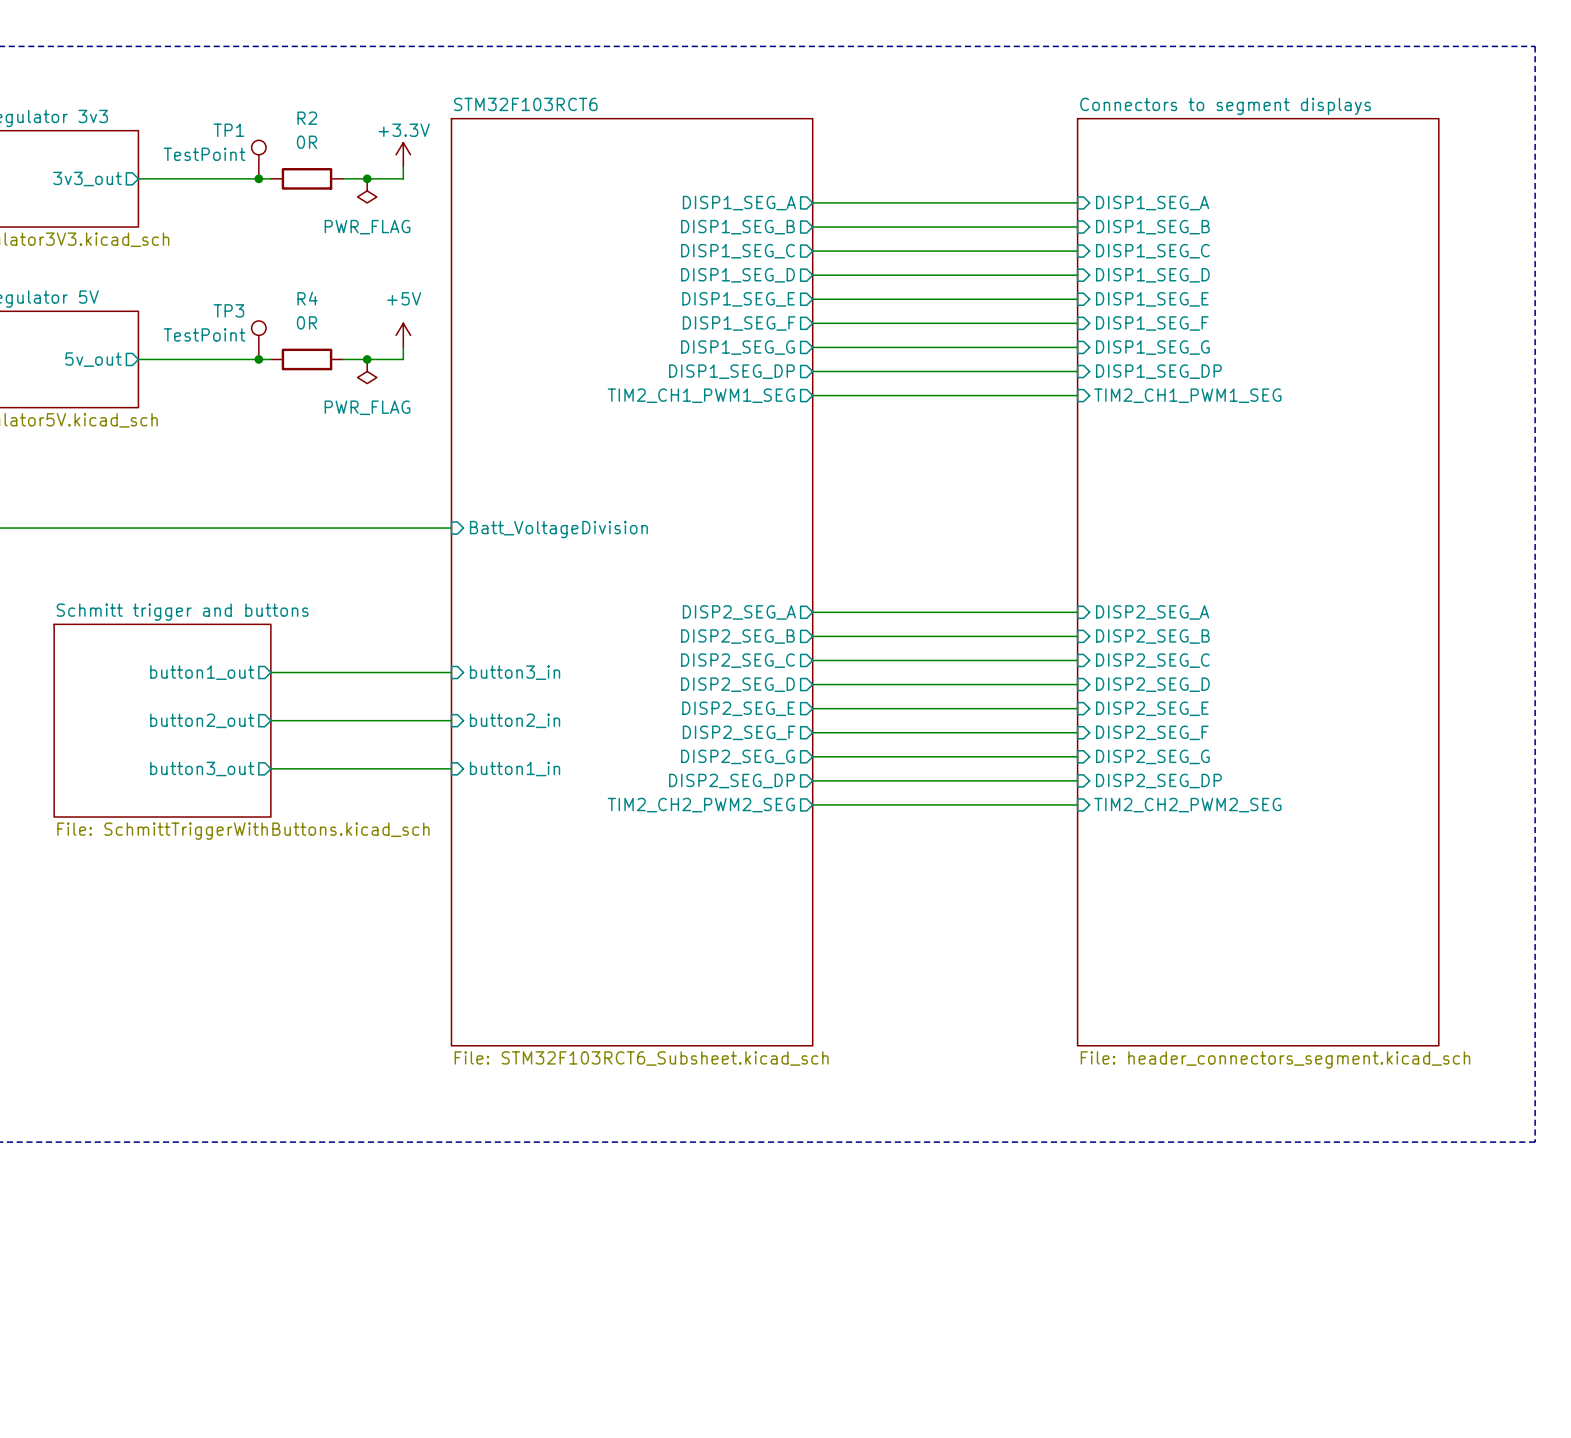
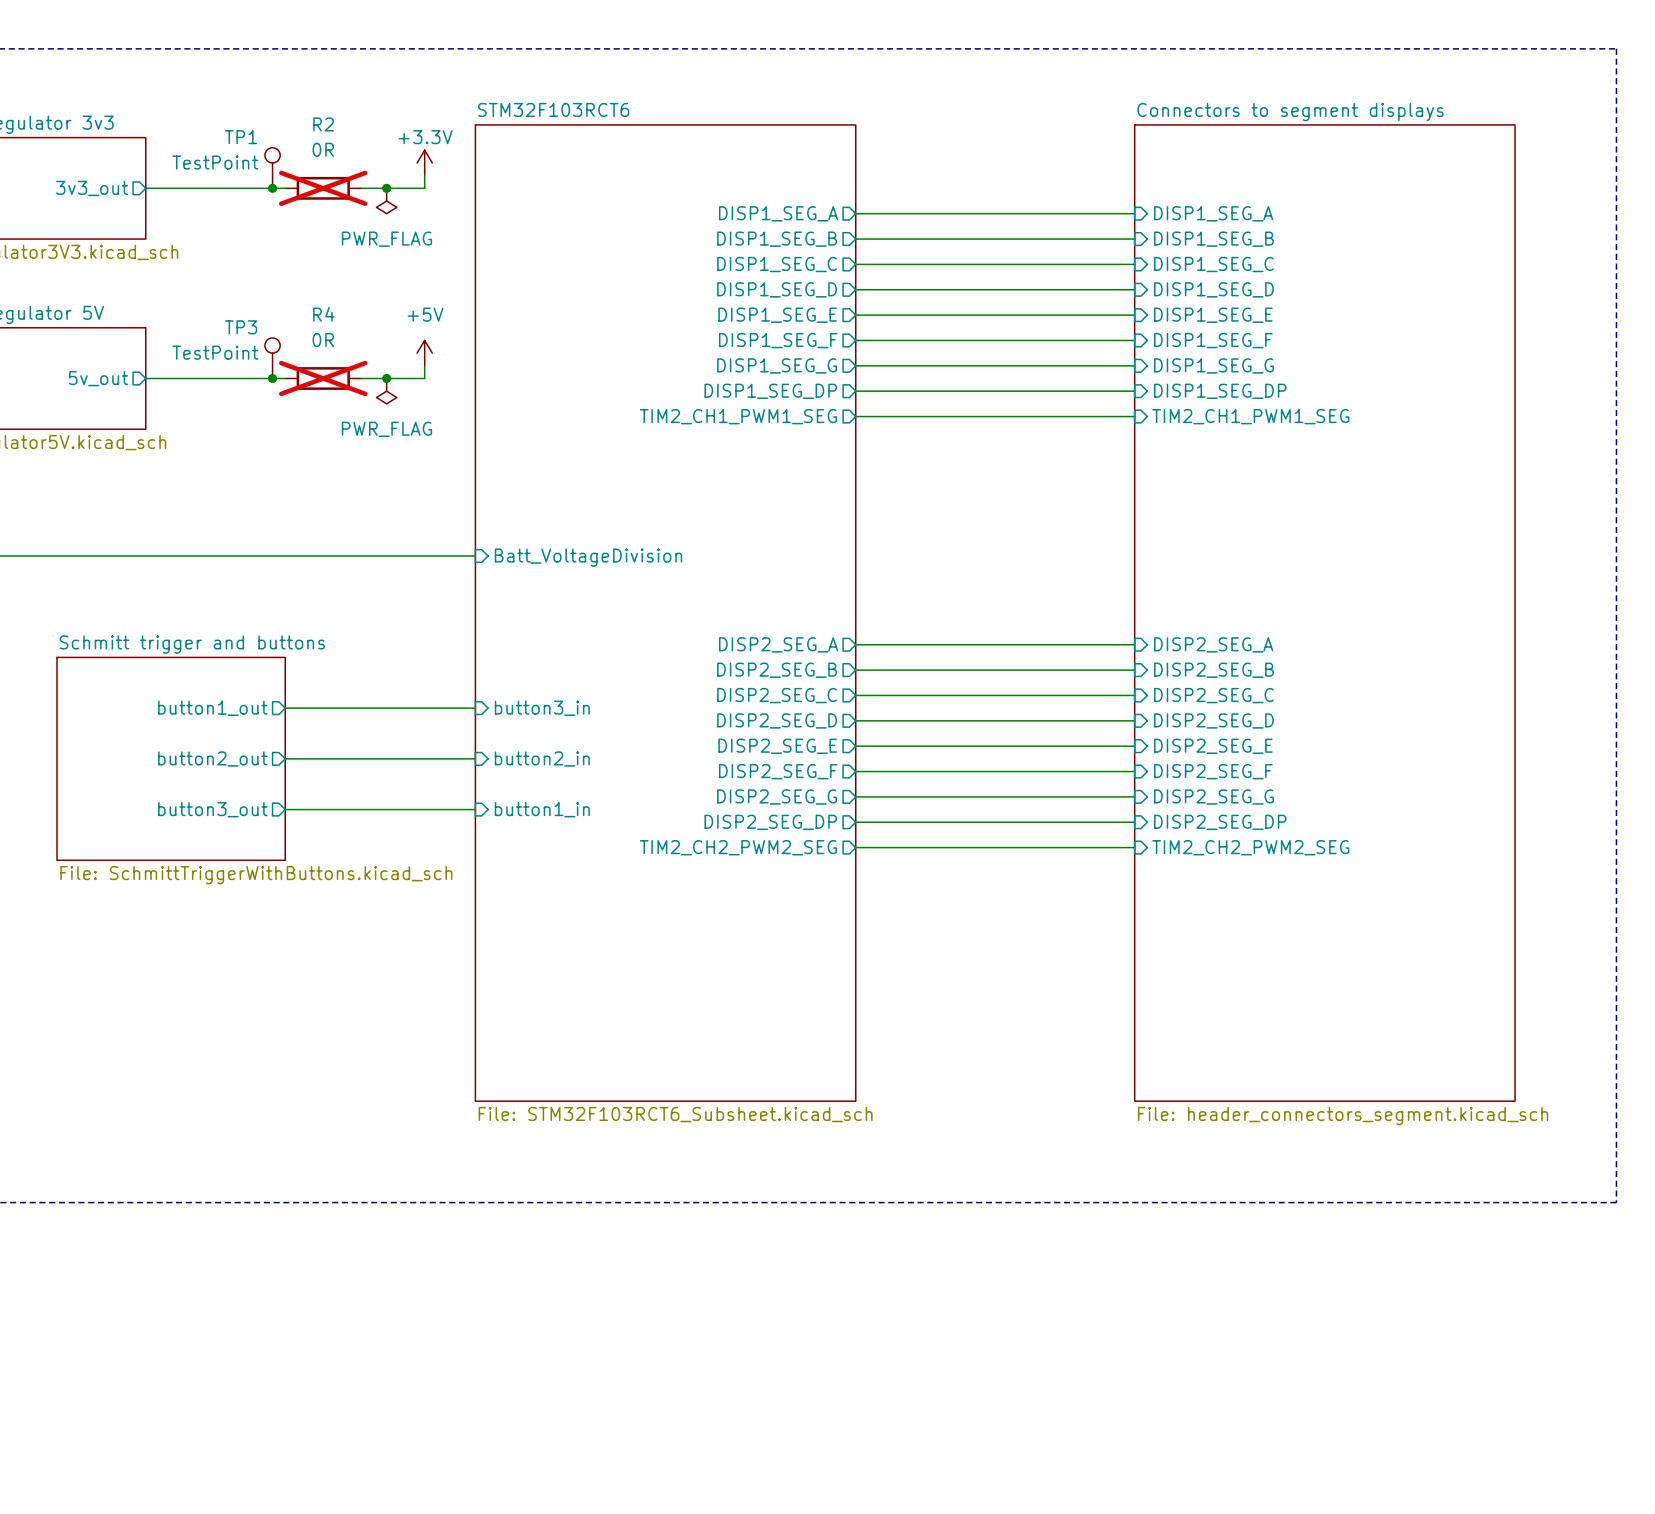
R2 do-not-place cross: none -> (323, 188)
R4 do-not-place cross: none -> (323, 378)

